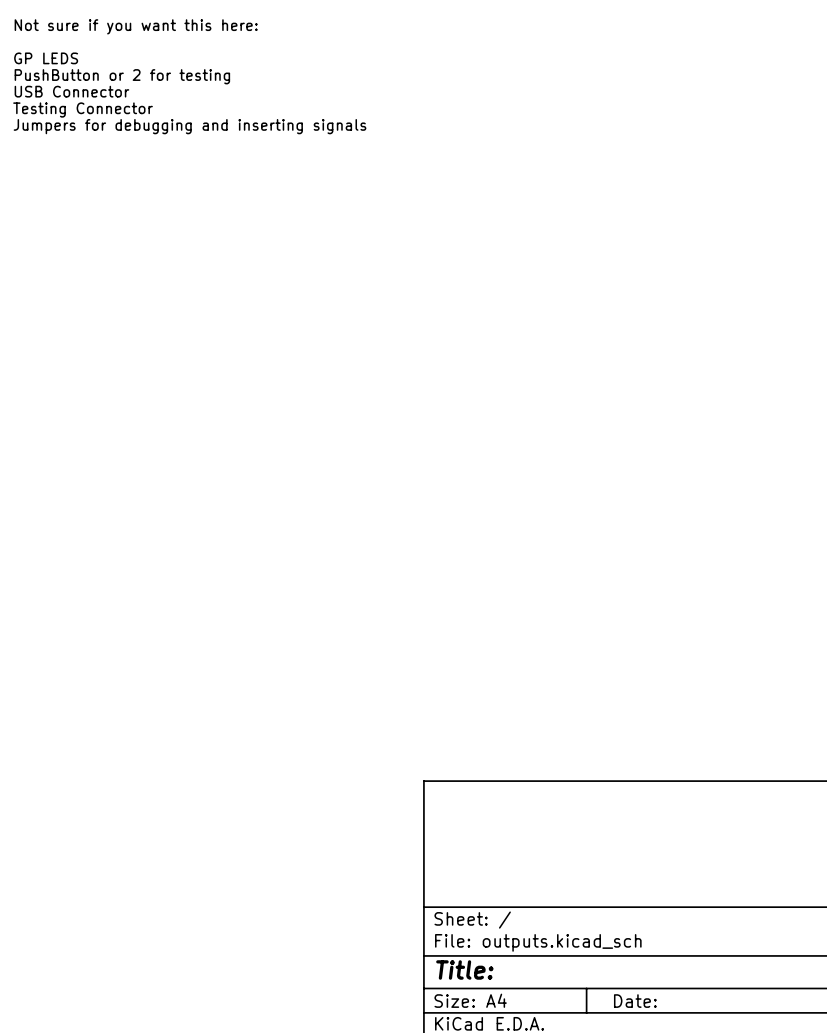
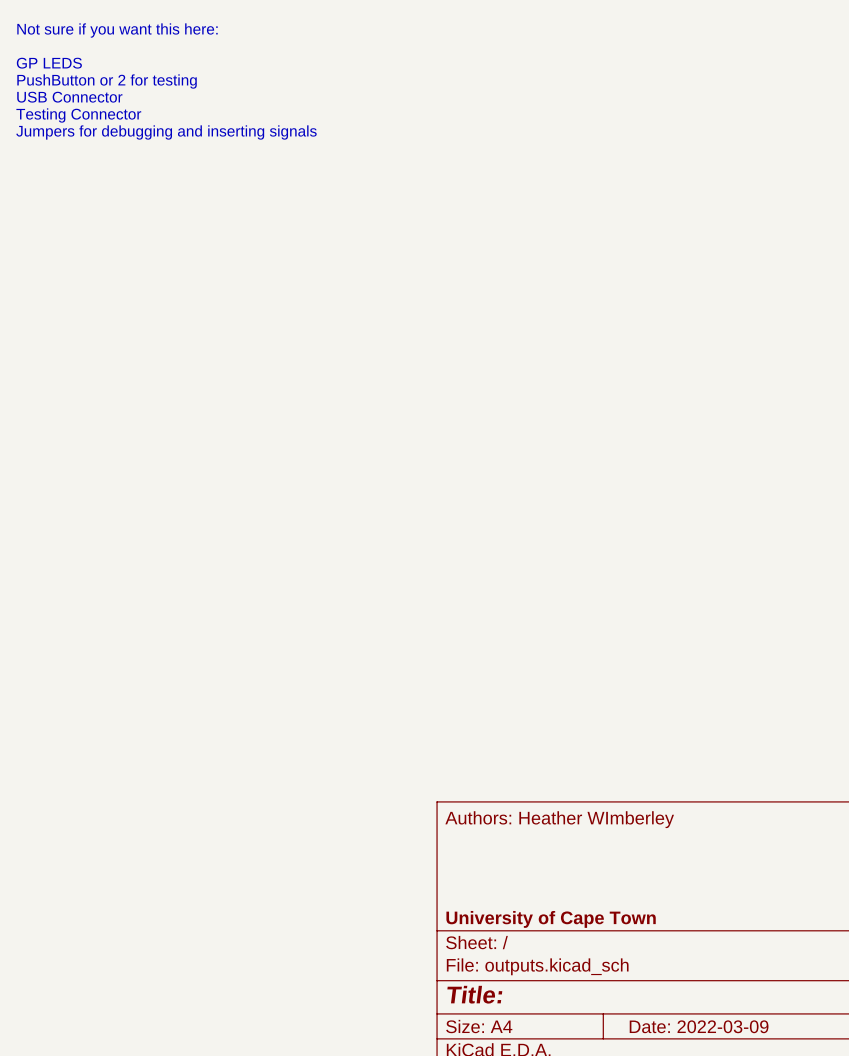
title block: none -> Authors: Heather WImberley (559, 819)
title block: none -> University of Cape Town (551, 919)
title block: Date: (635, 1001) -> Date: 2022-03-09 (699, 1026)

